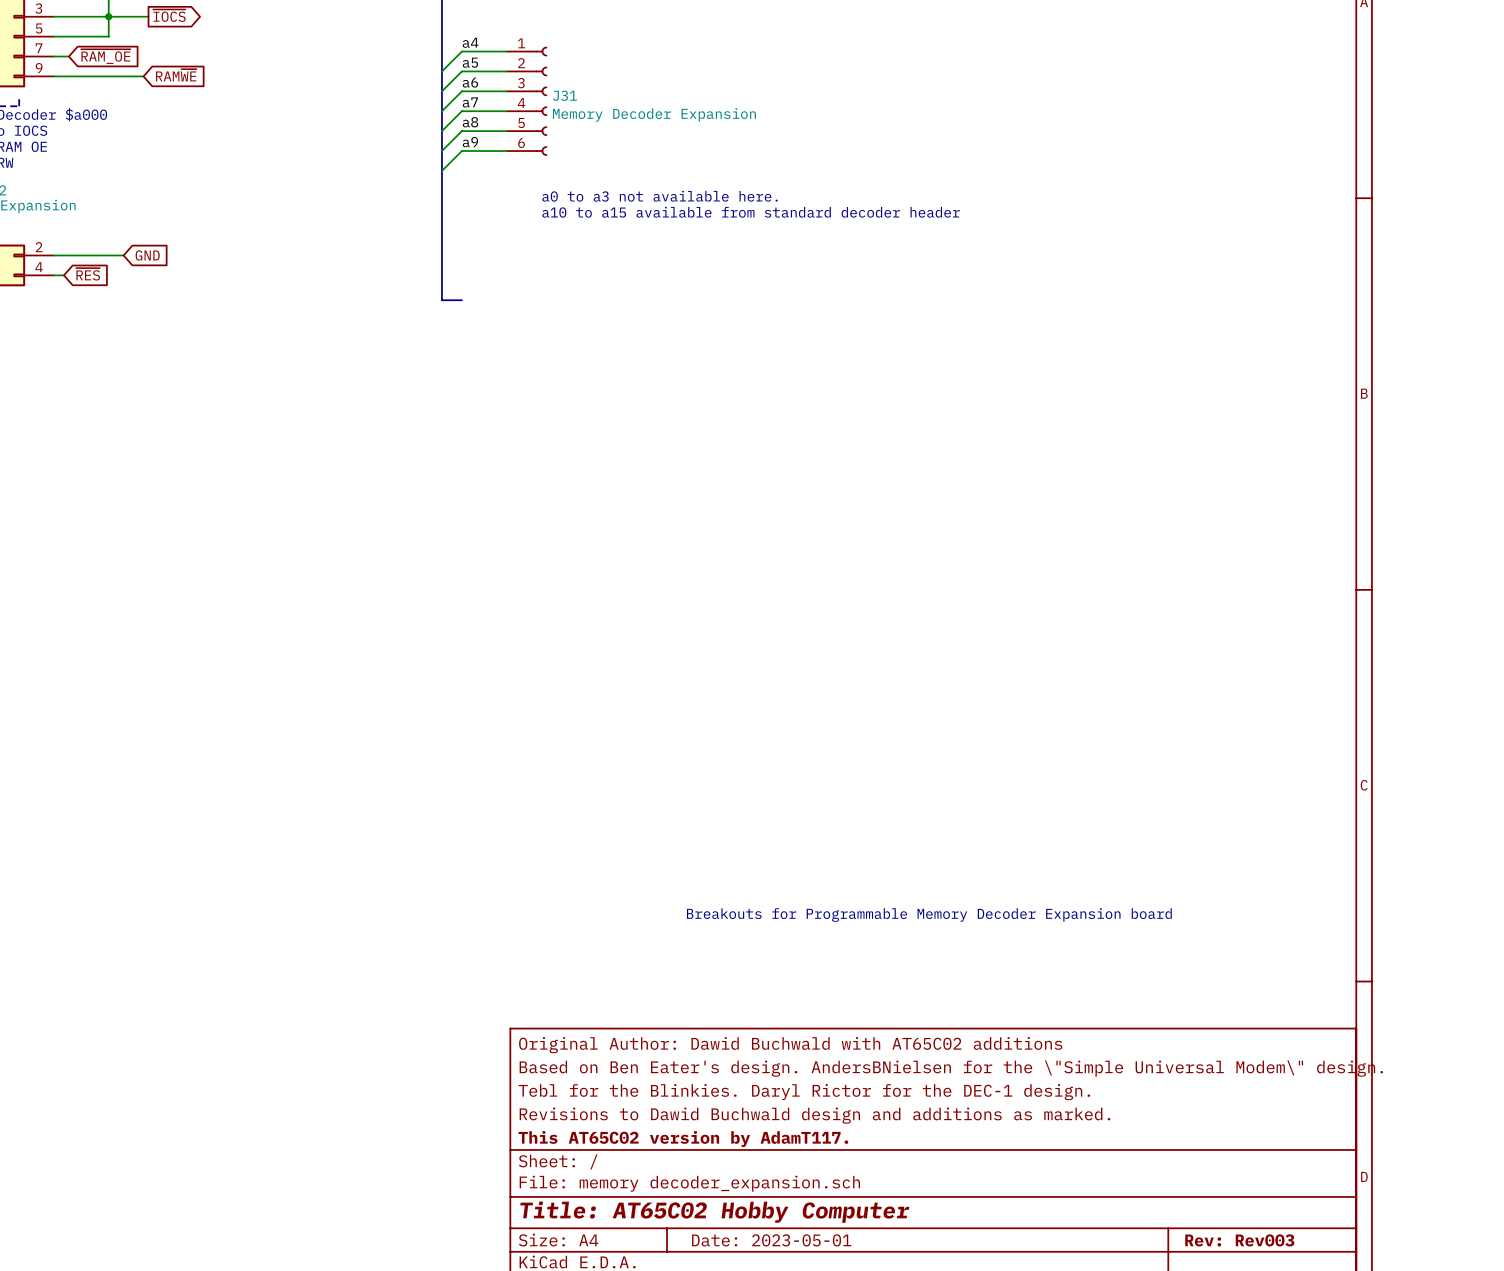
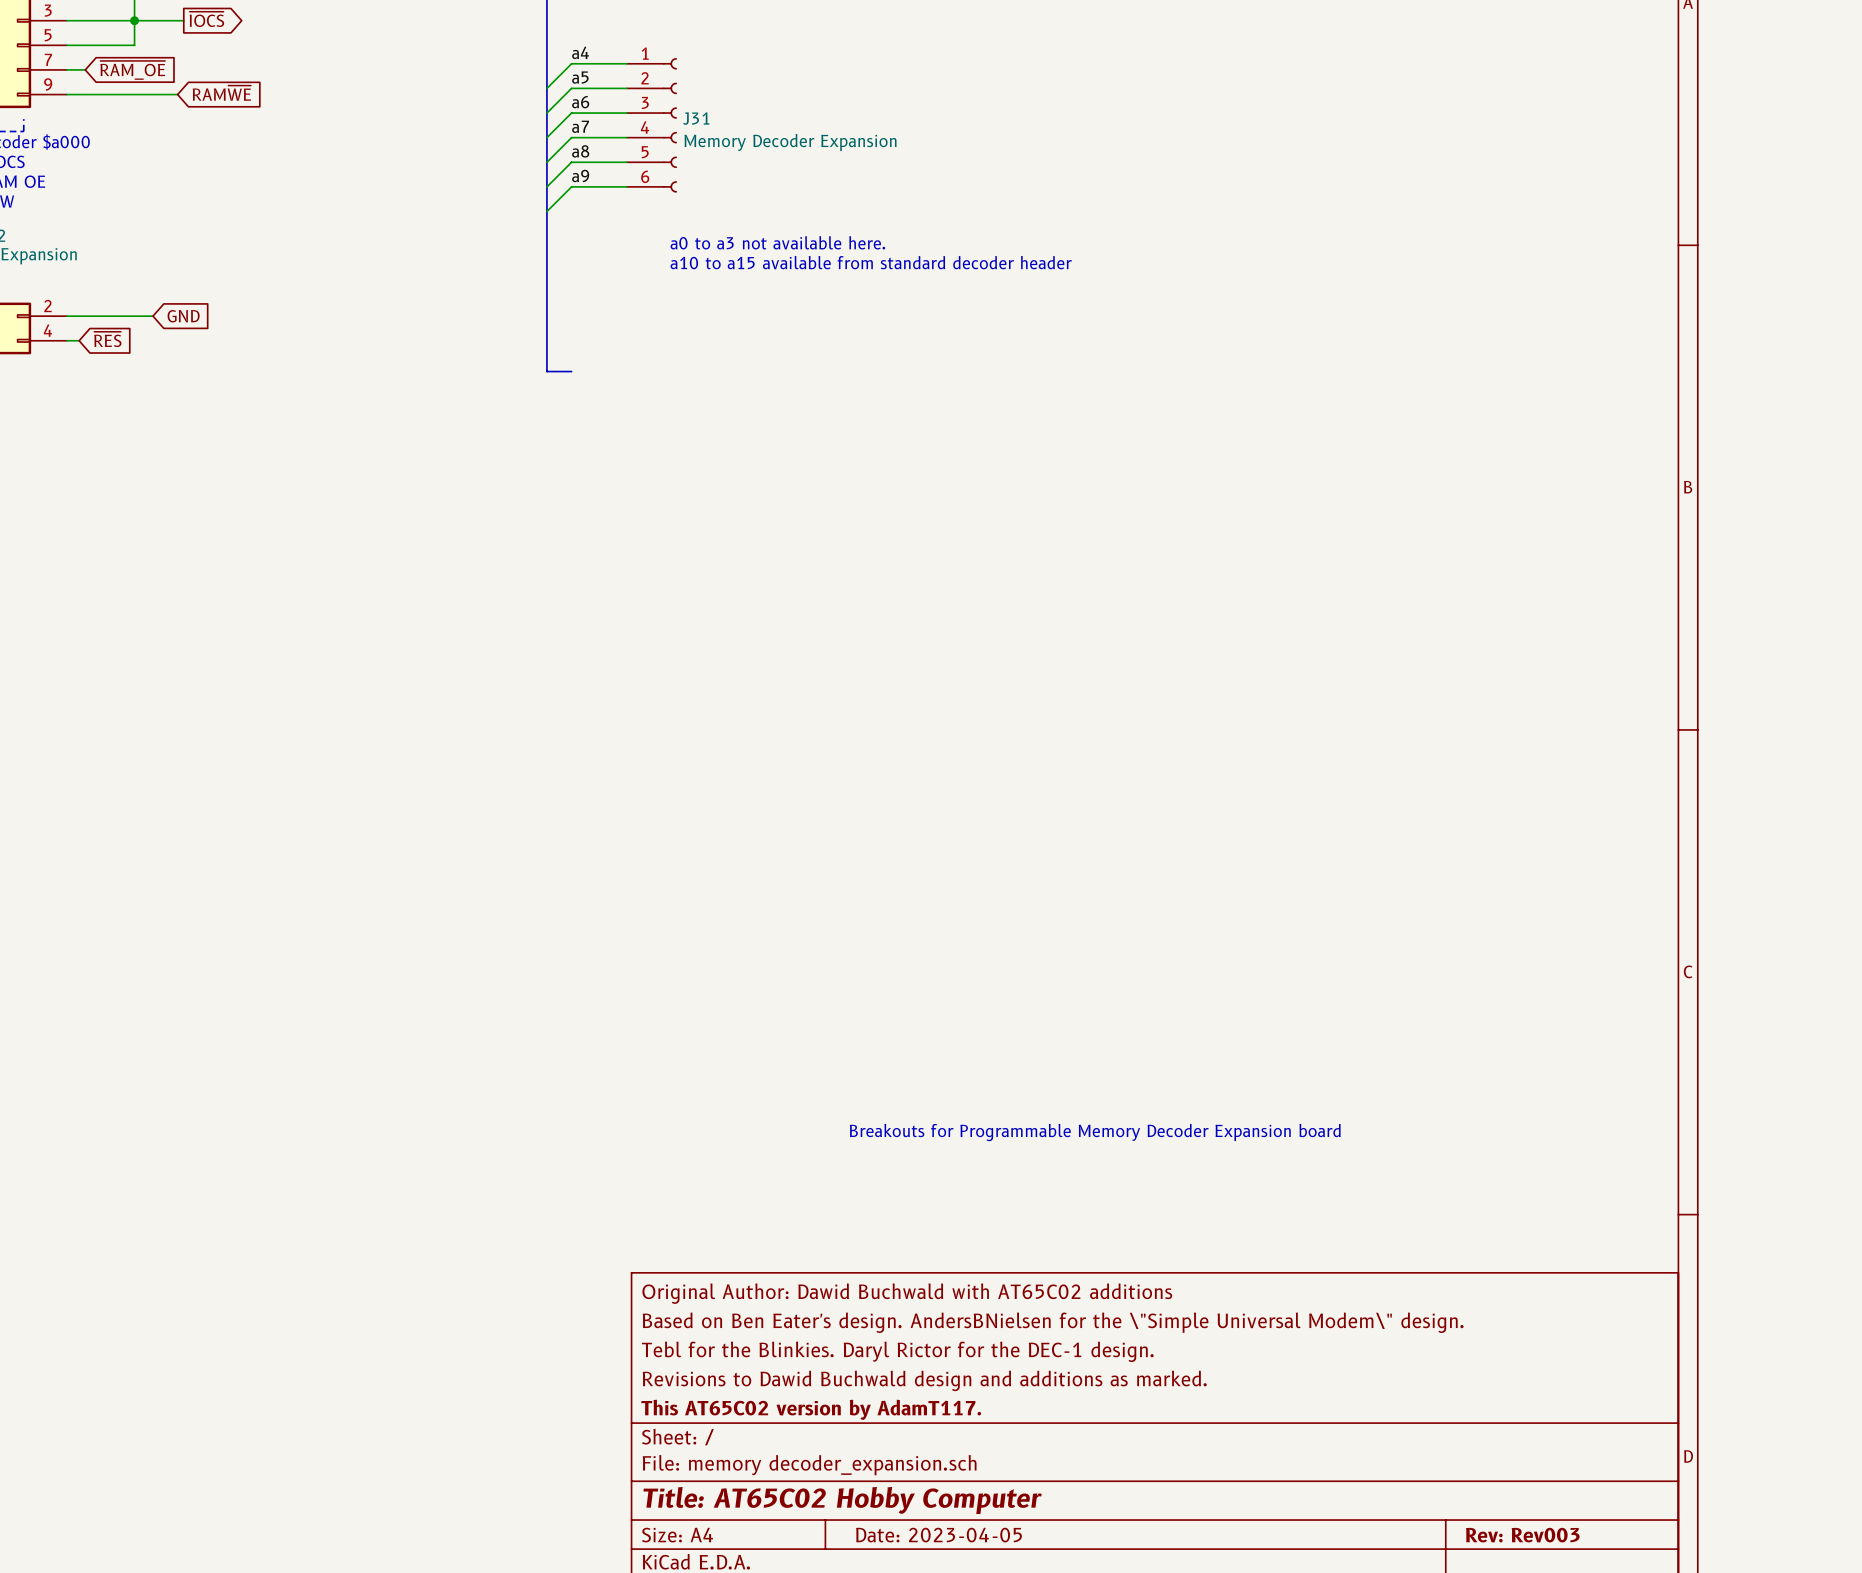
title block: Date: 2023-05-01 (771, 1240) -> Date: 2023-04-05 (938, 1535)

